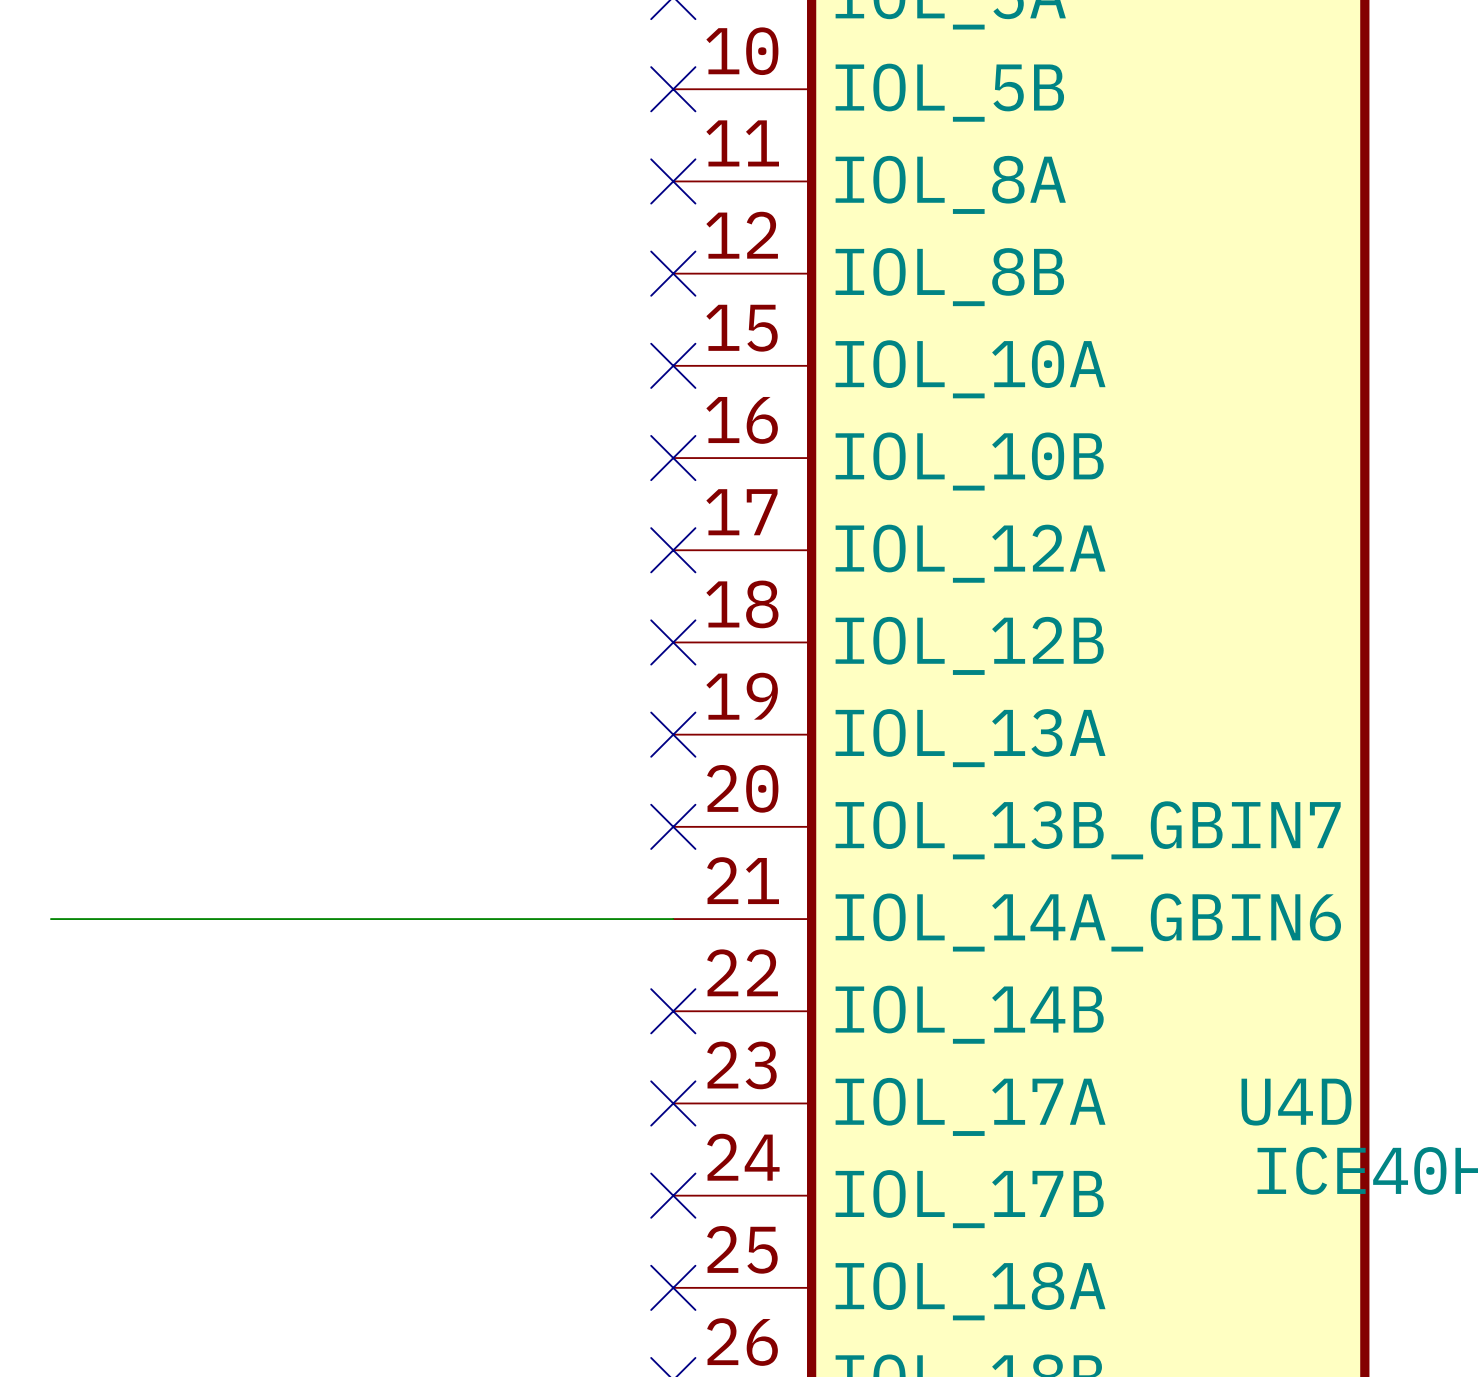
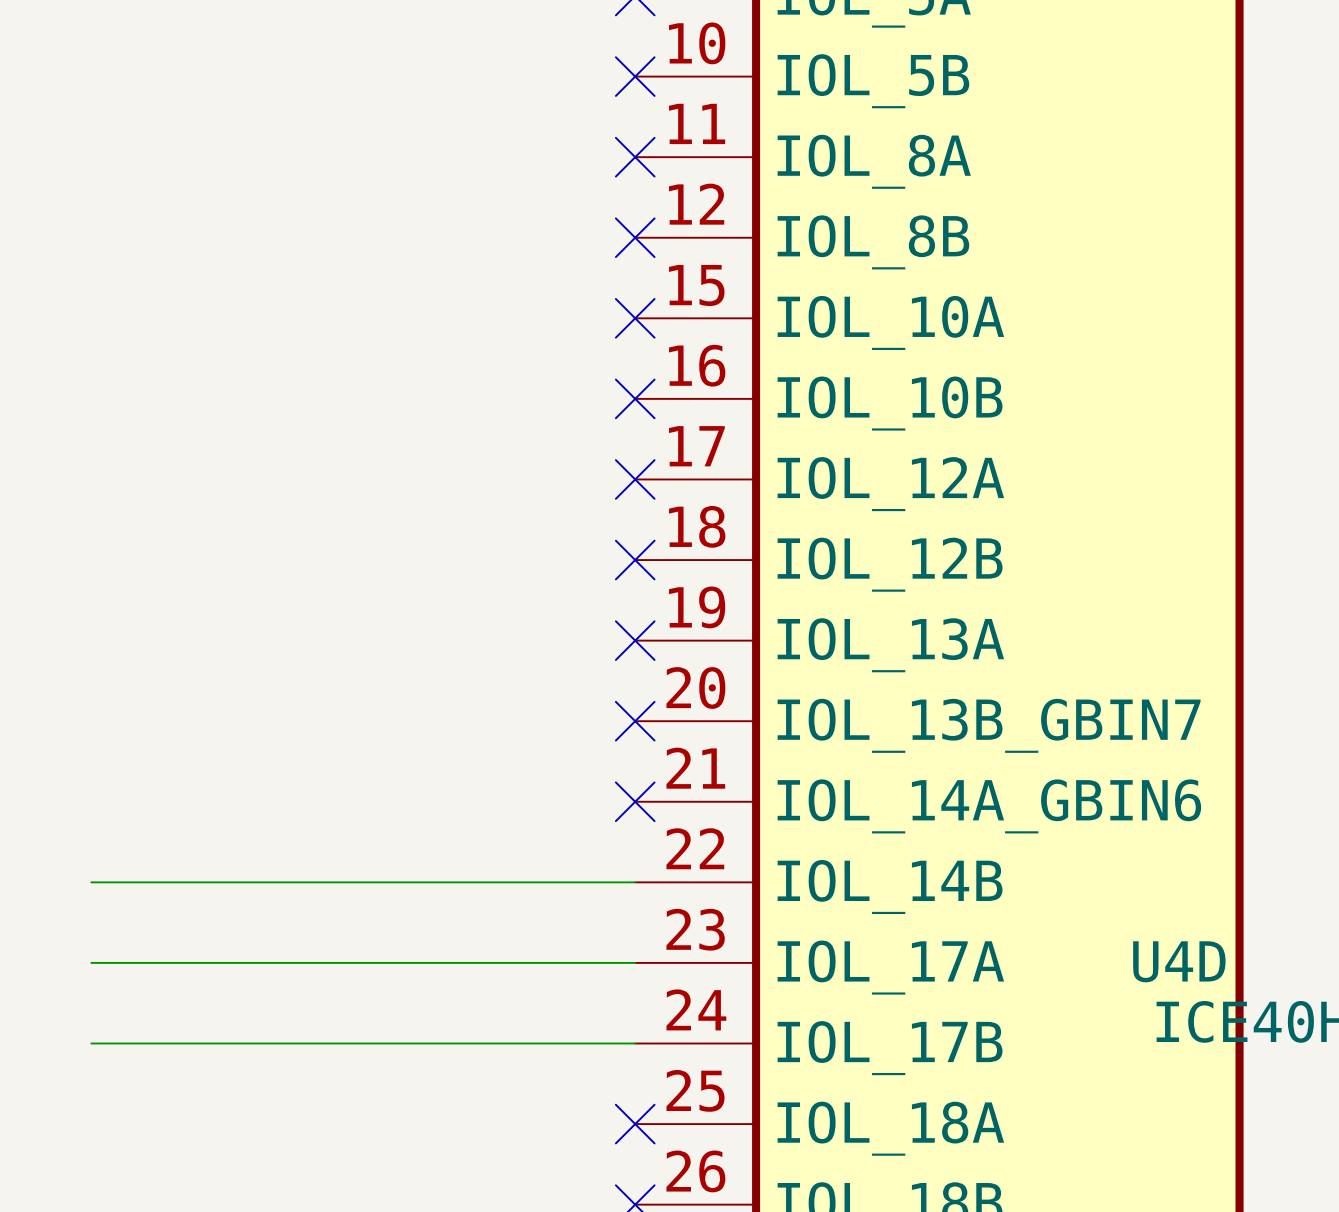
wire: (50, 919) (673, 919) -> (91, 882) (635, 882)
no-connect mark: none -> (635, 801)
no-connect mark: (673, 1011) -> none
wire: none -> (91, 962) (635, 962)
no-connect mark: (673, 1103) -> none
wire: none -> (91, 1043) (635, 1043)
no-connect mark: (673, 1195) -> none

